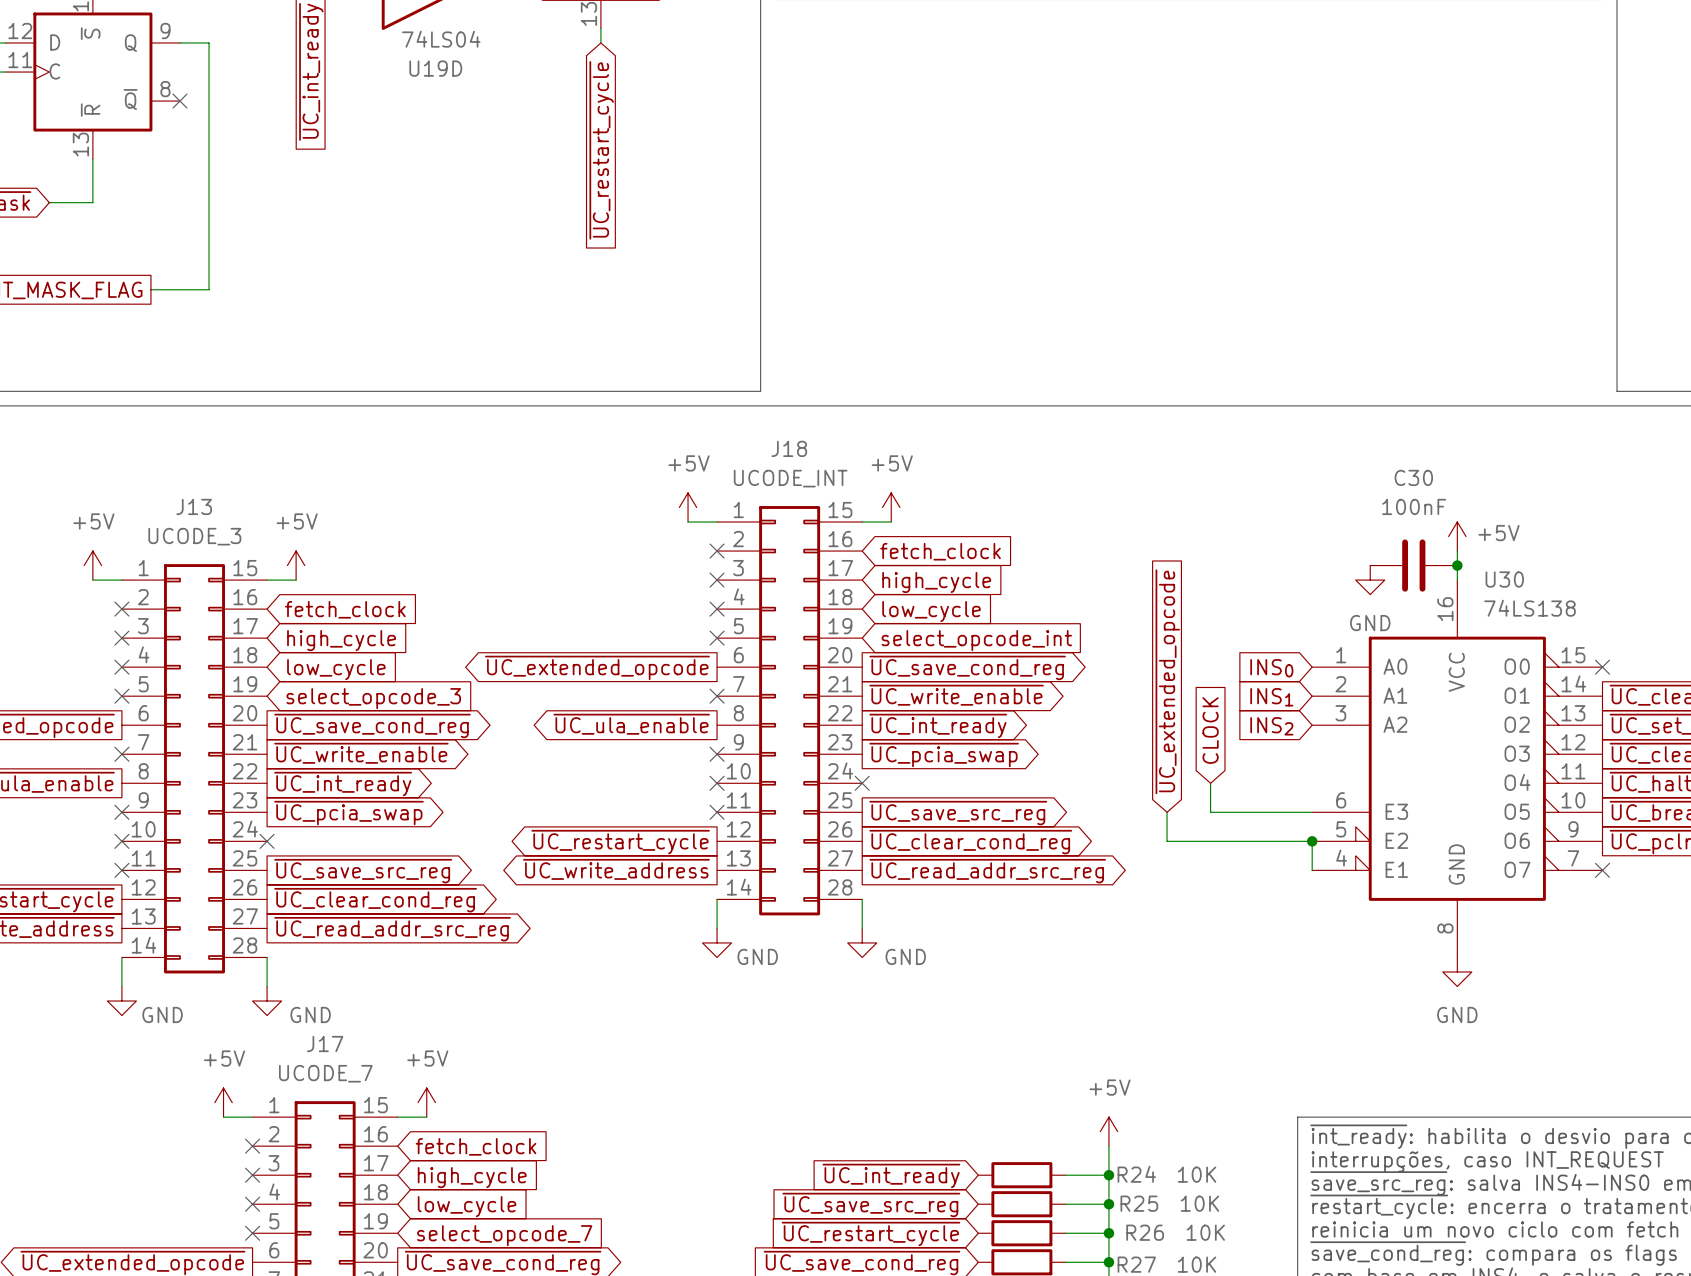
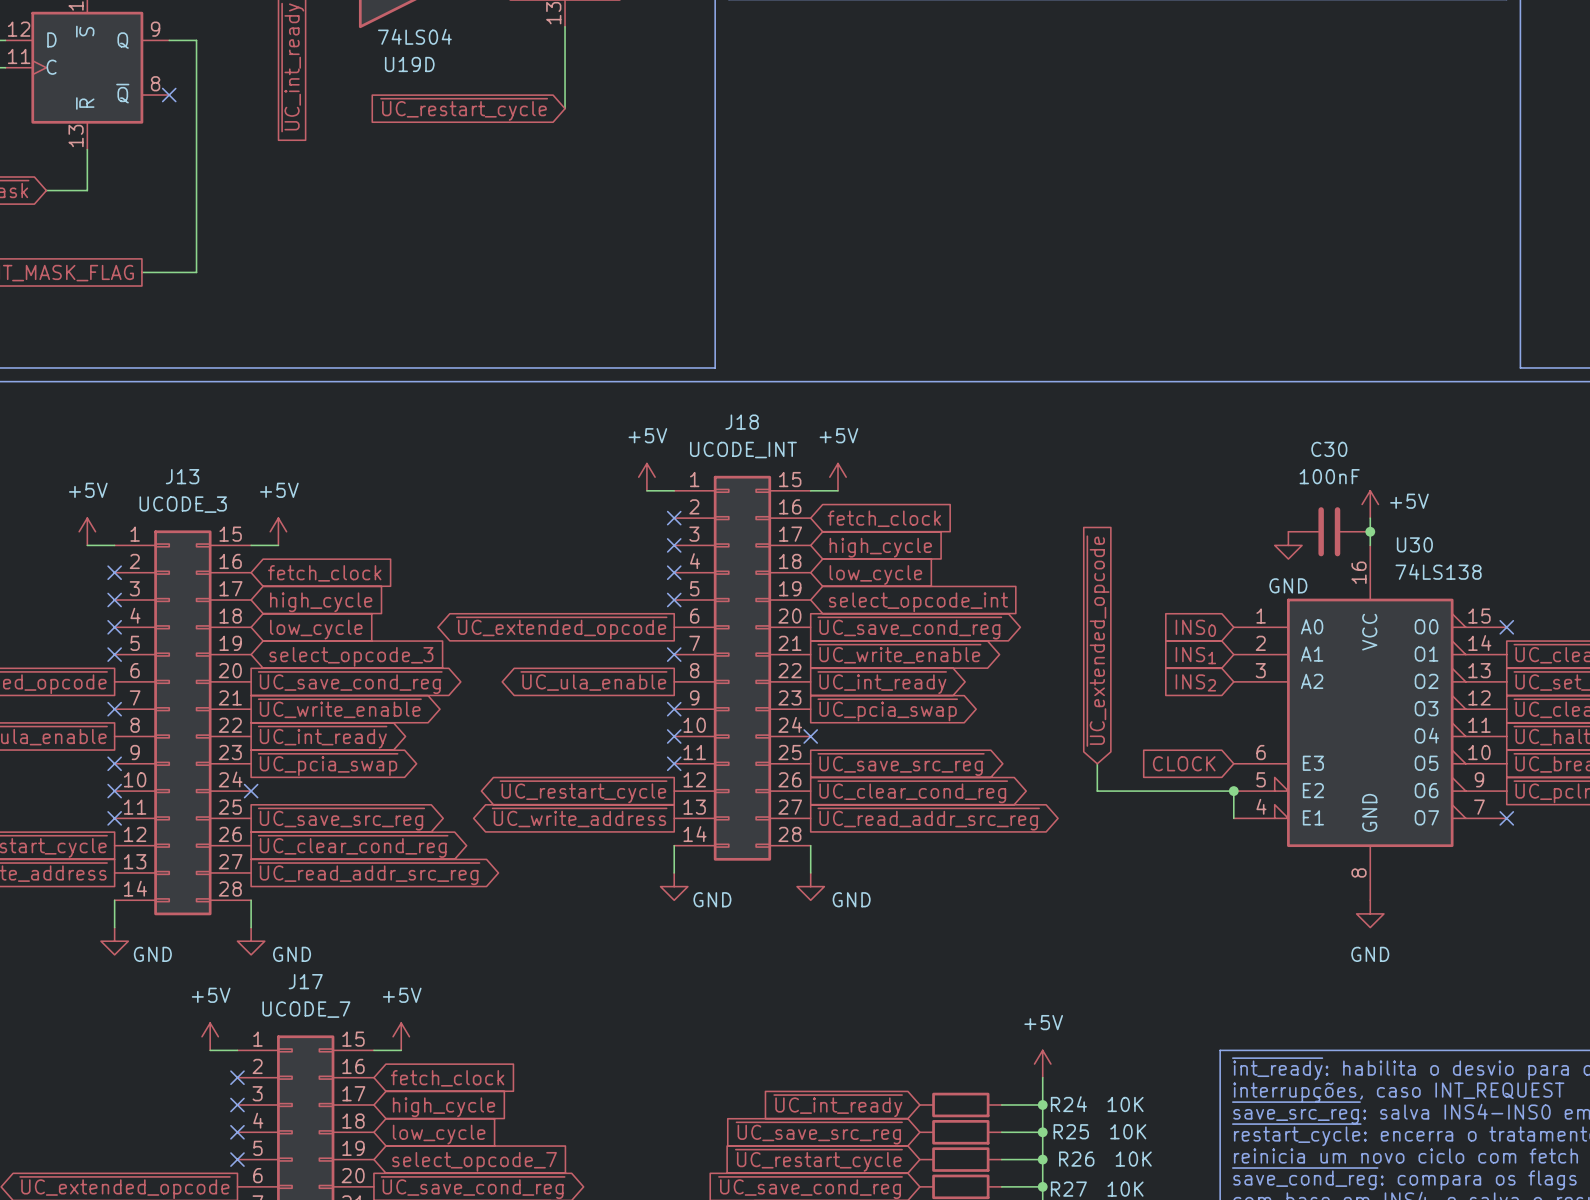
wire: none -> (565, 40) (565, 108)
global label rotation: 0° (601, 150) -> 90° clockwise (464, 109)
global label rotation: 0° (1210, 730) -> 90° counterclockwise (1184, 763)
wire: (1210, 783) (1210, 812) (1312, 812) -> none

